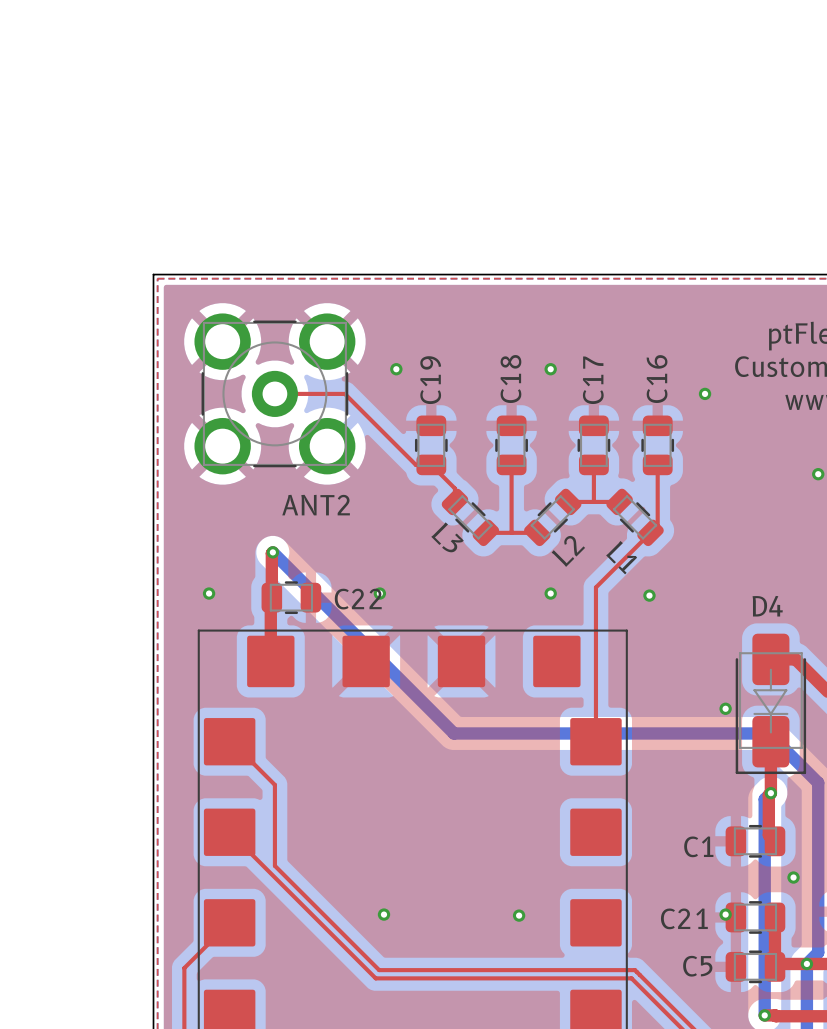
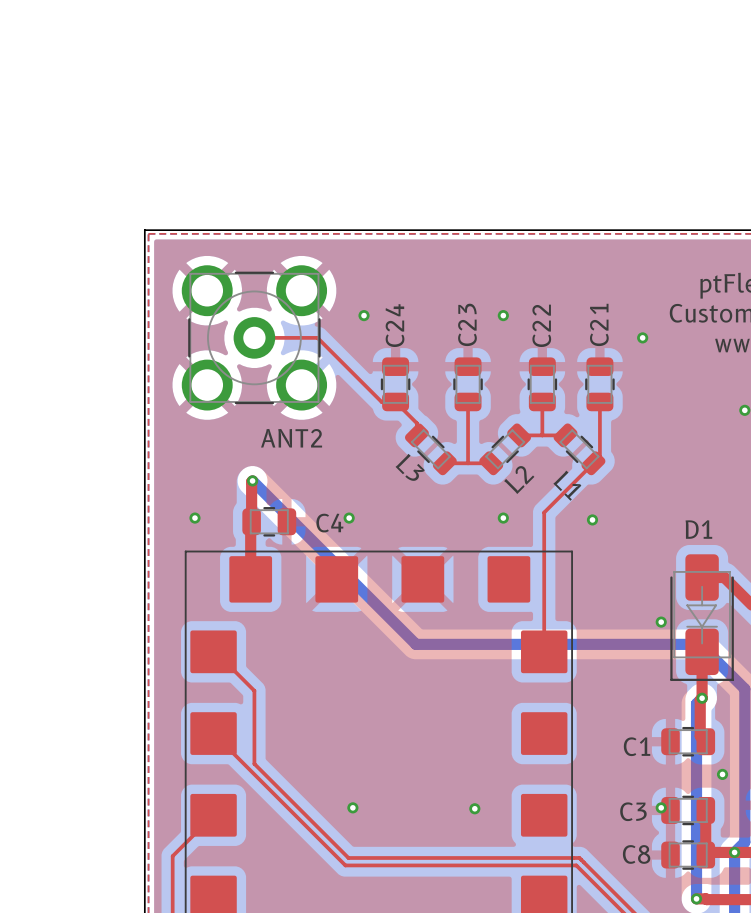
C18 name: C18 (510, 379) -> C23 (467, 324)
C16 name: C16 (657, 379) -> C21 (599, 324)
C19 name: C19 (430, 380) -> C24 (395, 325)
C17 name: C17 (593, 380) -> C22 (541, 325)
C22 name: C22 (358, 599) -> C4 (329, 523)
D4 name: D4 (767, 606) -> D1 (698, 529)
C21 name: C21 (684, 918) -> C3 (633, 811)
C5 name: C5 (697, 966) -> C8 (636, 854)

